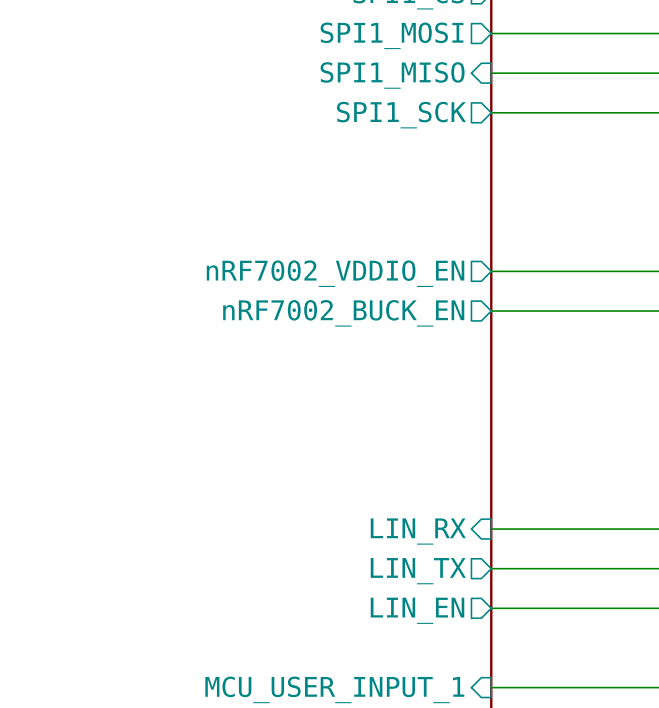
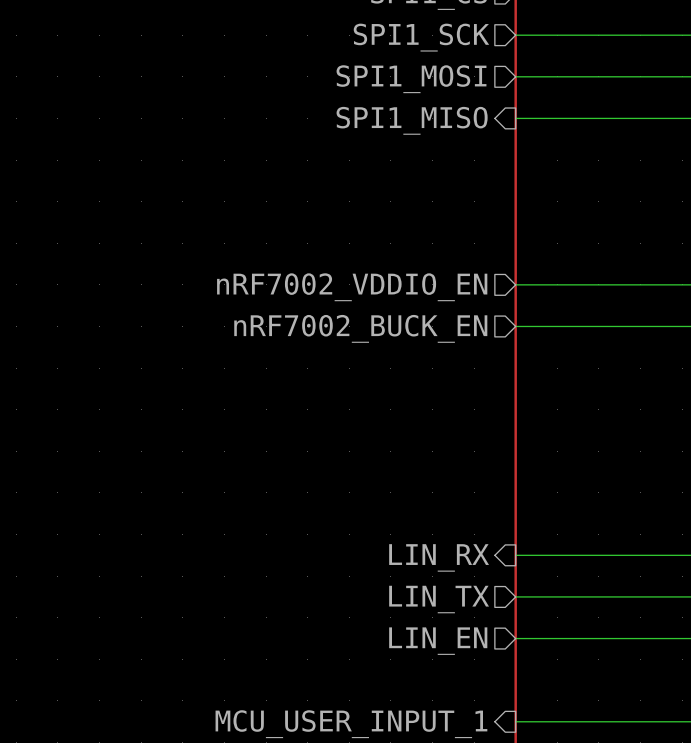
sheet pin: SPI1_MOSI (392, 35) -> SPI1_SCK (421, 37)
sheet pin shape: input (392, 75) -> output (411, 79)
sheet pin: SPI1_MISO (392, 75) -> SPI1_MOSI (411, 79)
sheet pin shape: output (401, 115) -> input (412, 120)
sheet pin: SPI1_SCK (401, 115) -> SPI1_MISO (412, 120)

